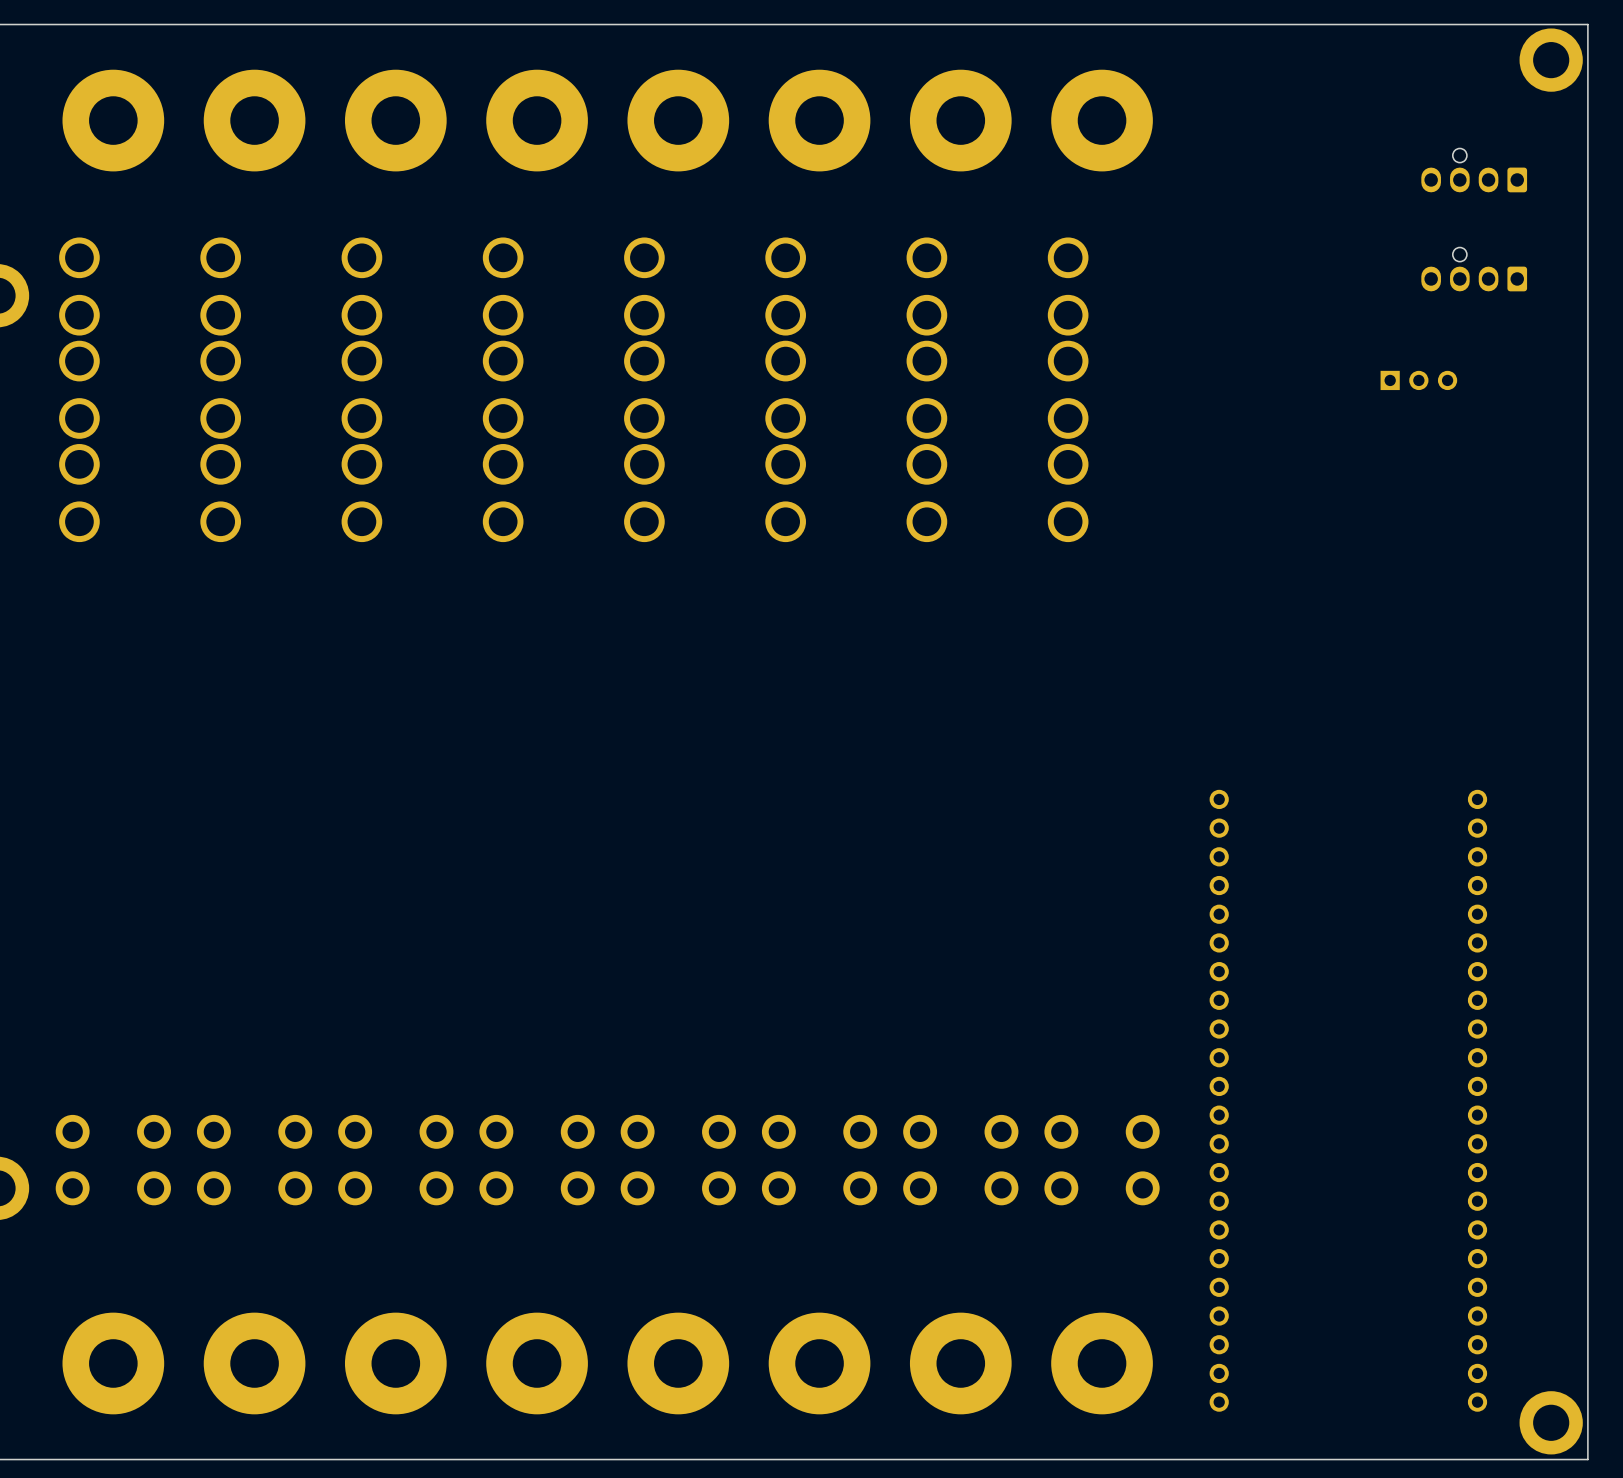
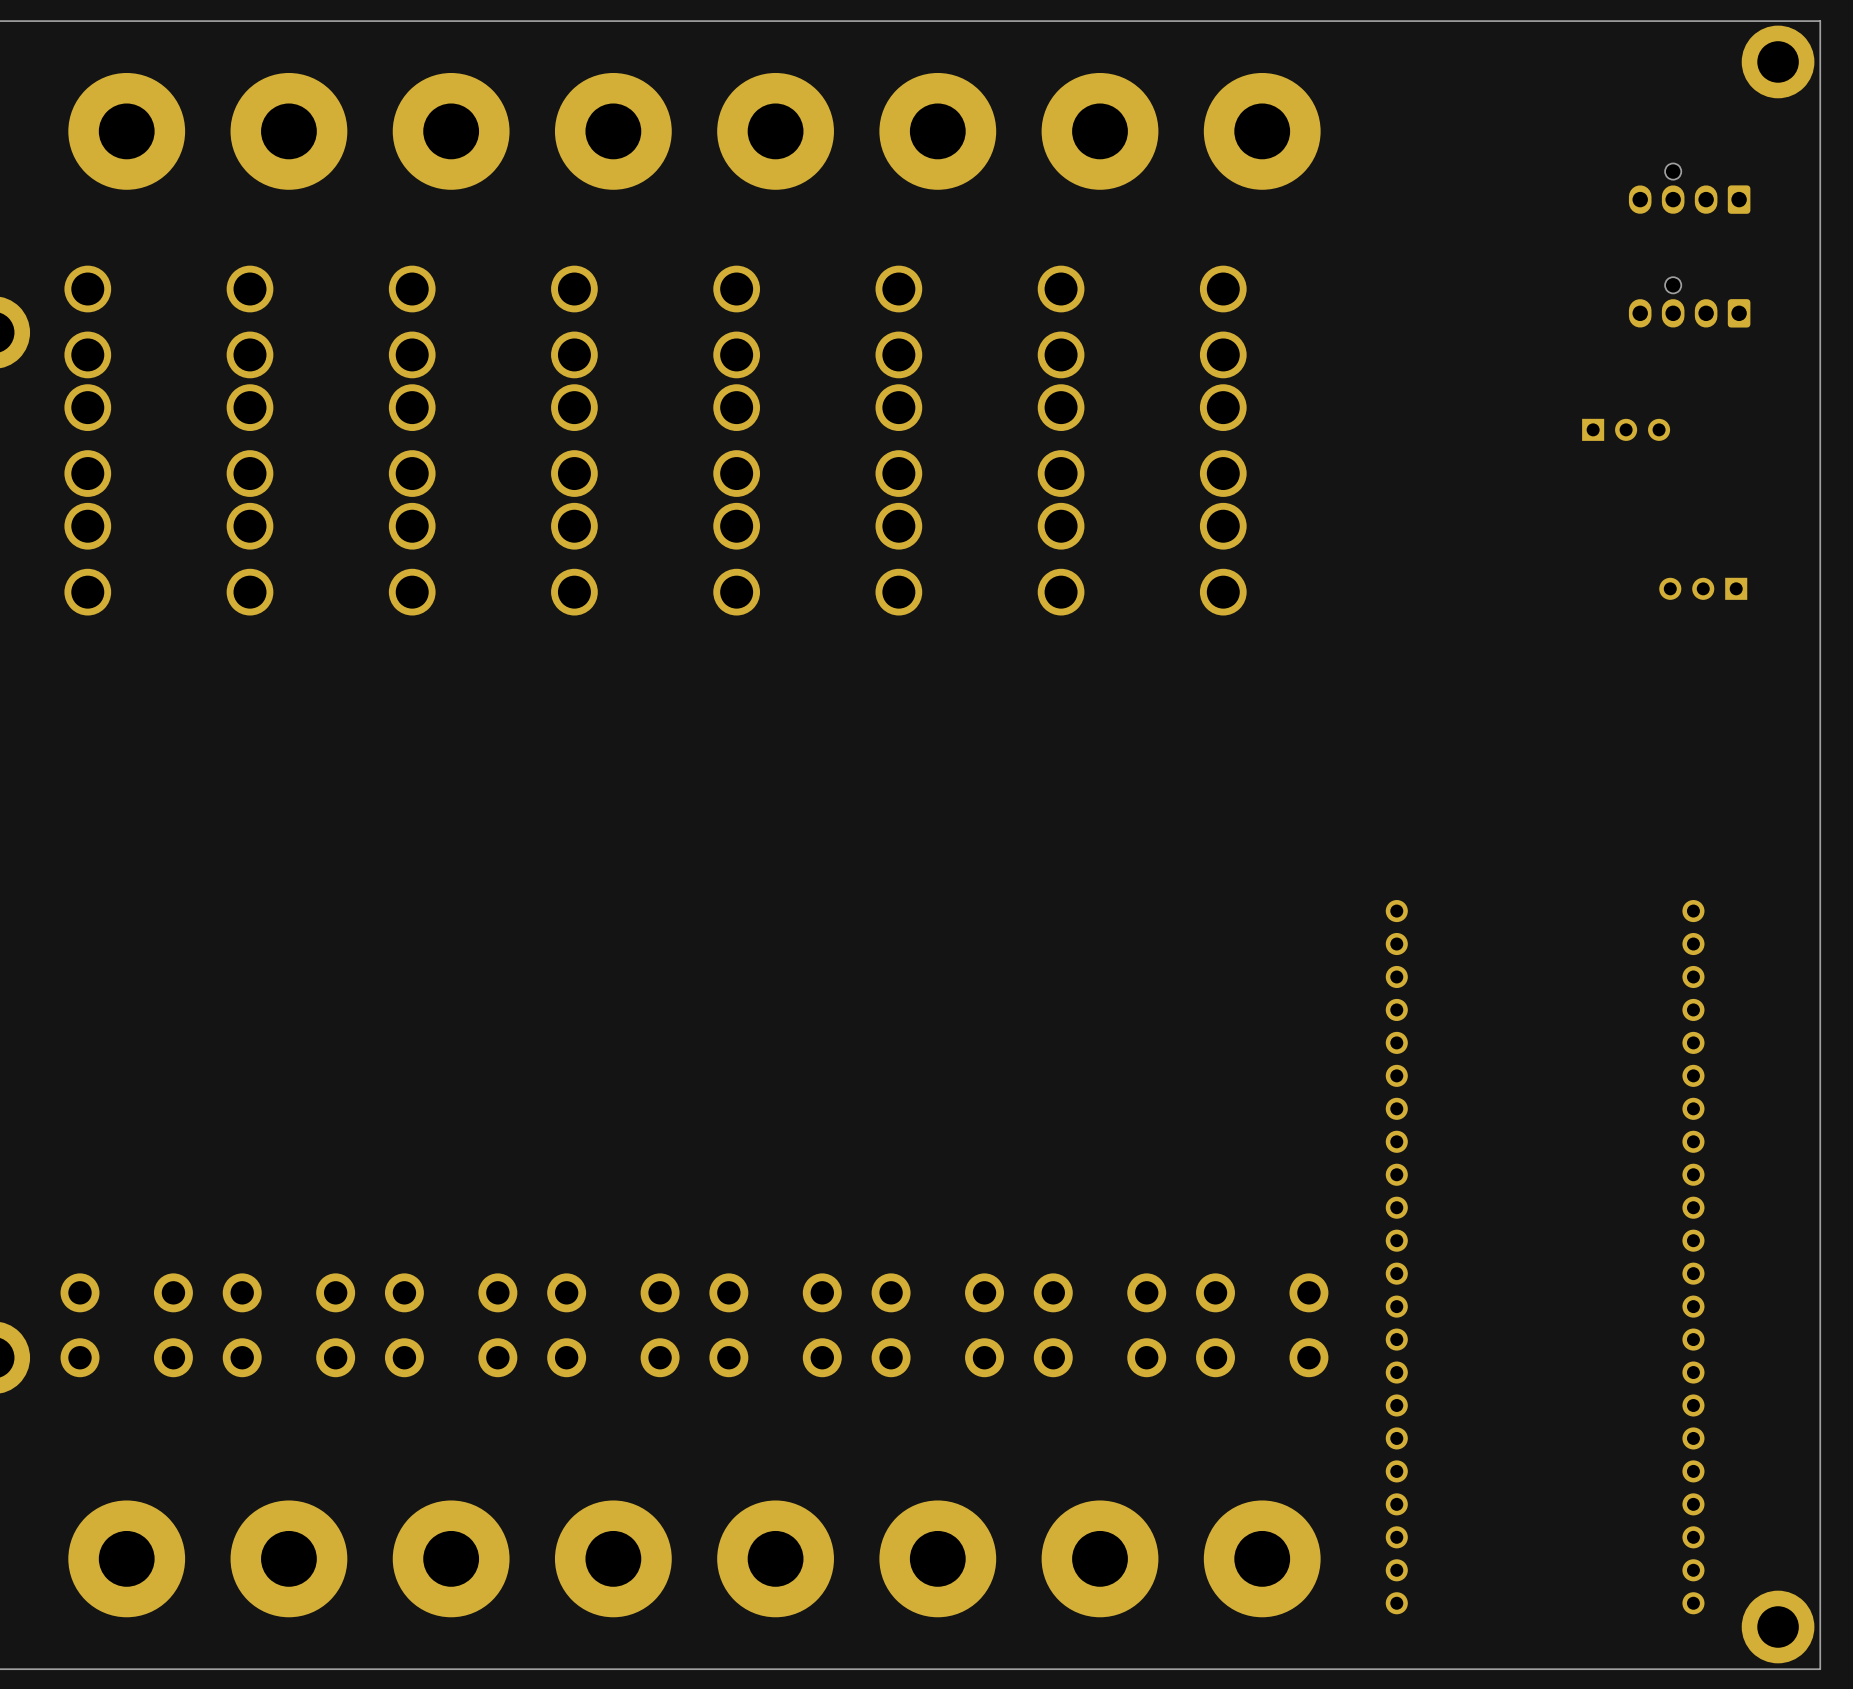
part: none -> (1703, 588)

